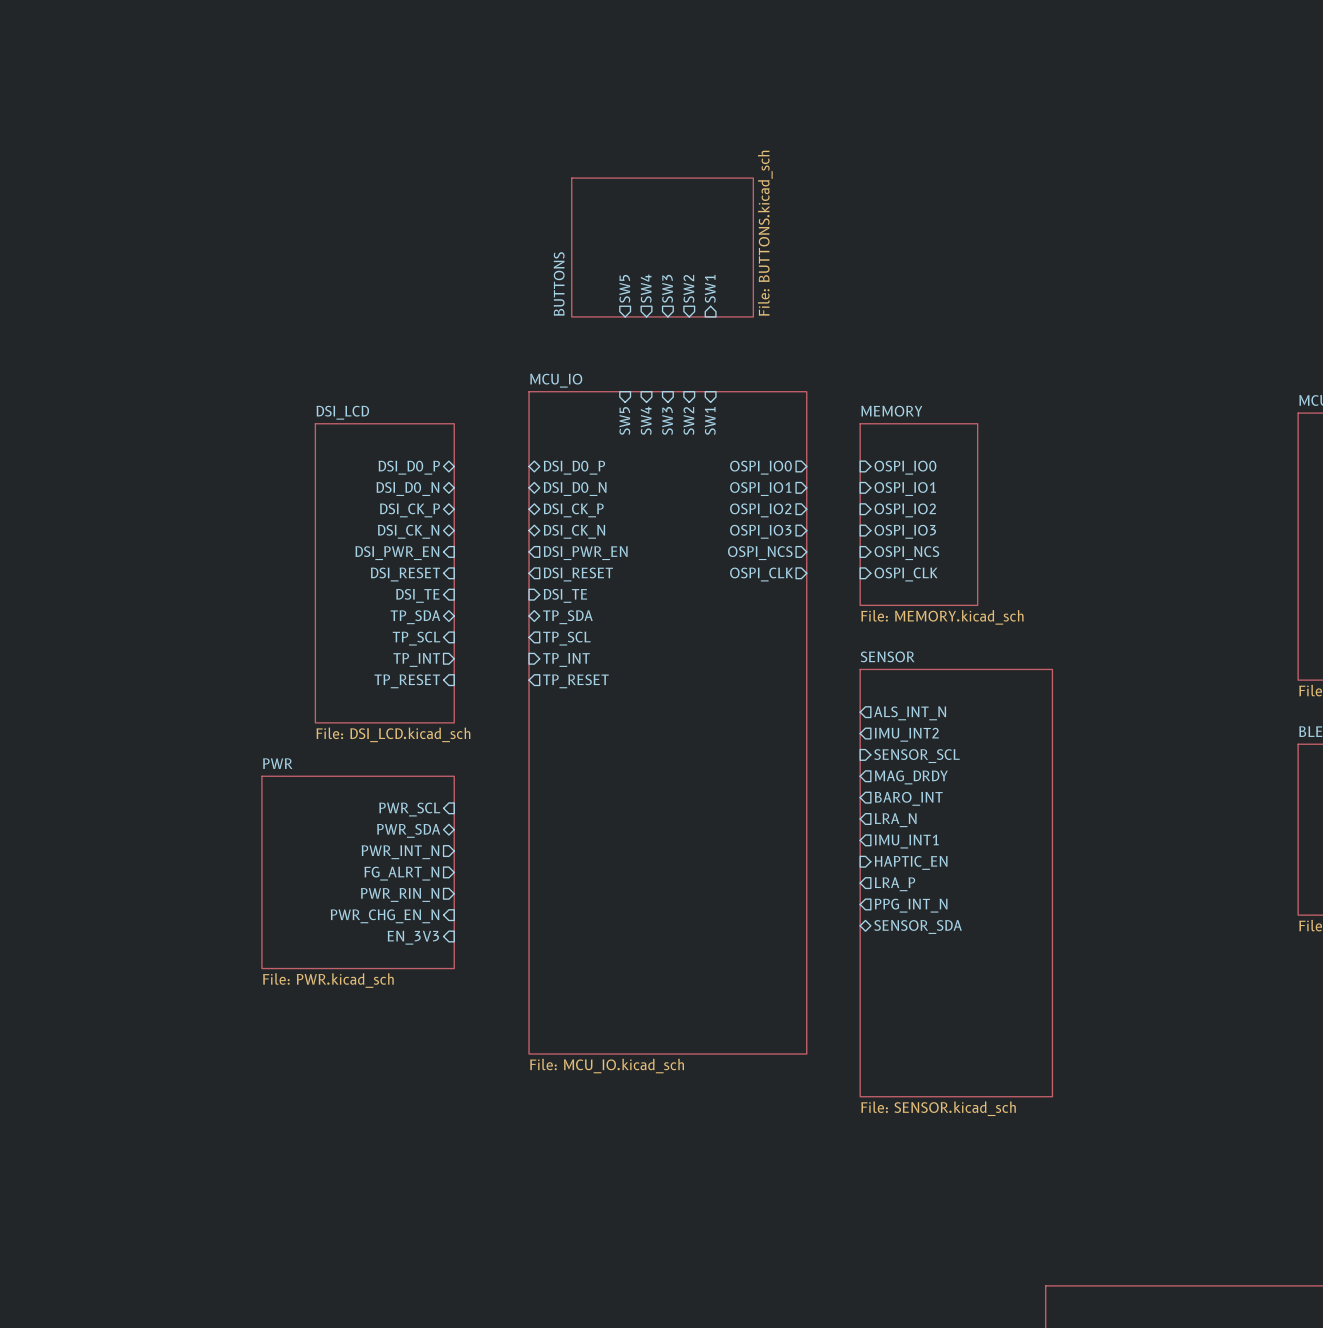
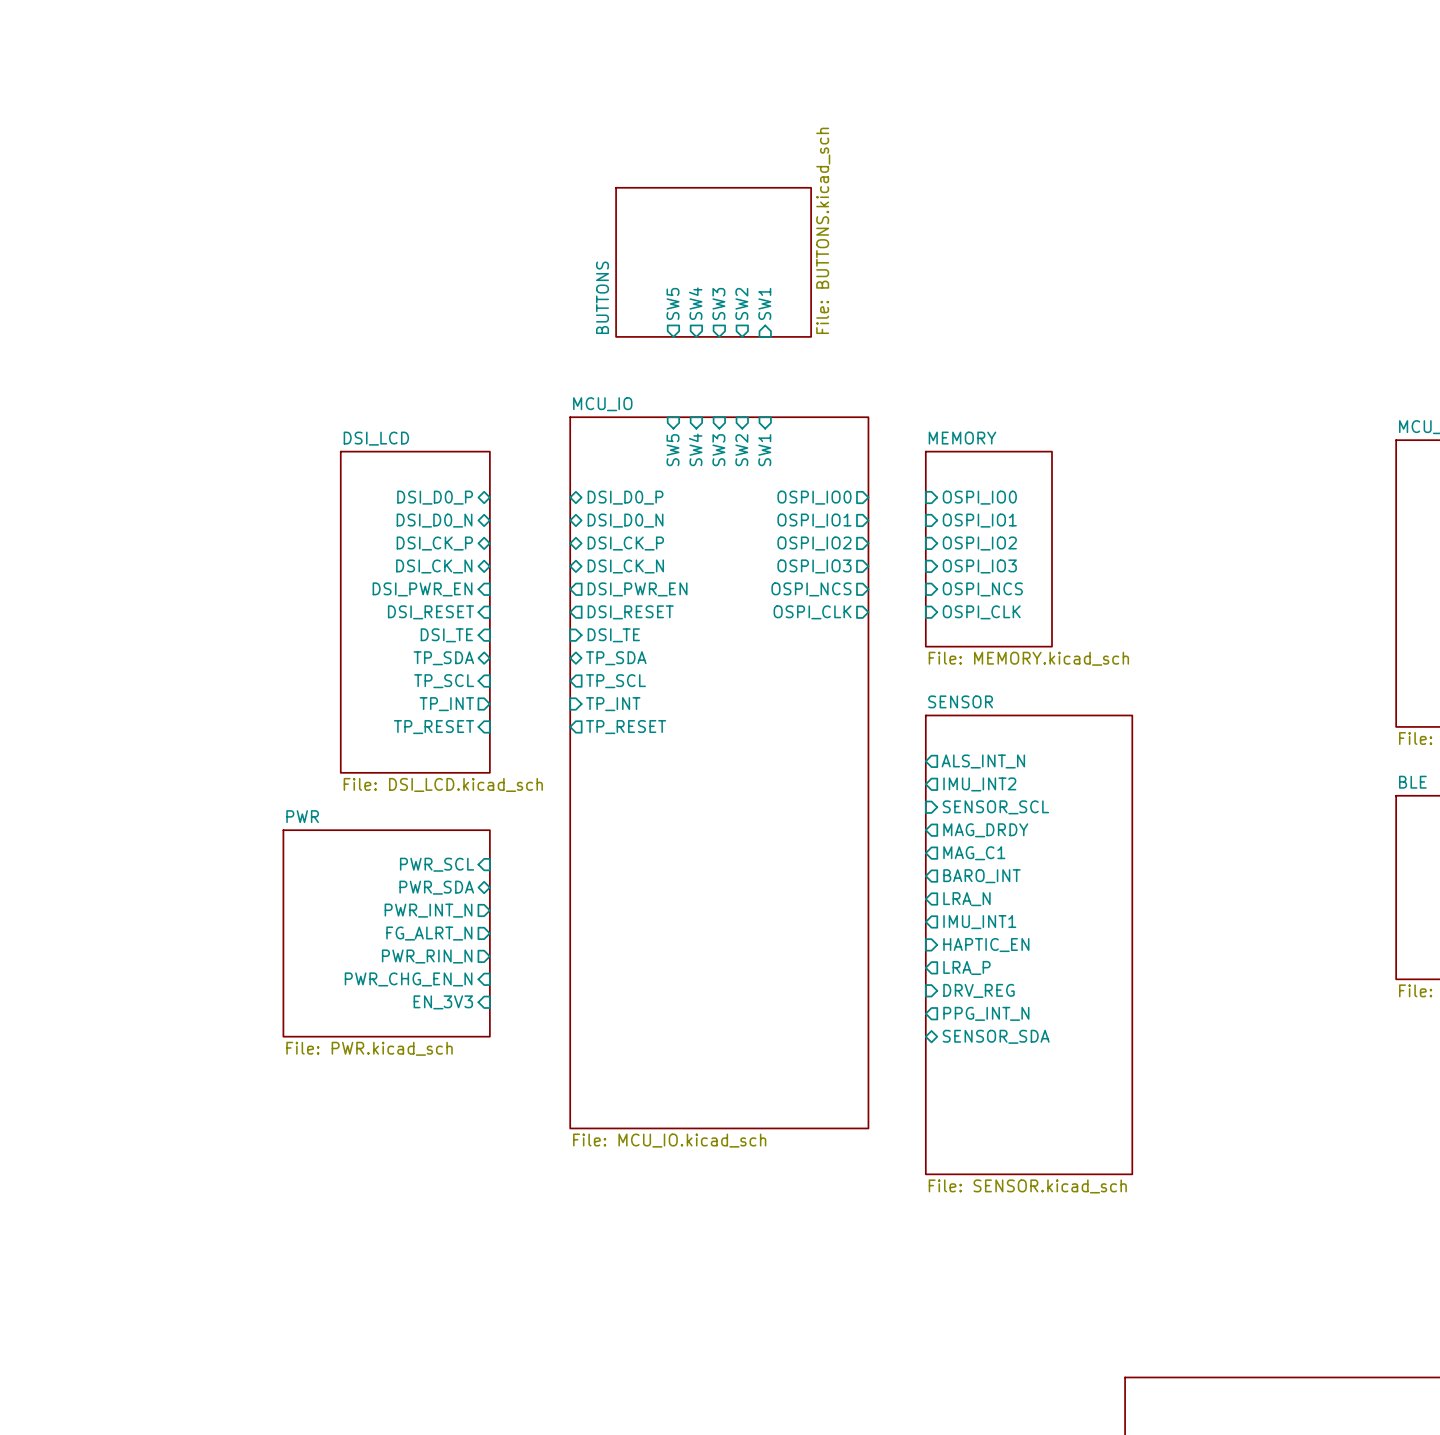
sheet pin: BARO_INT (908, 798) -> MAG_C1 (974, 853)
sheet pin: LRA_N (895, 820) -> BARO_INT (981, 876)
sheet pin: IMU_INT1 (906, 841) -> LRA_N (966, 899)
sheet pin shape: input (911, 862) -> output (979, 922)
sheet pin: HAPTIC_EN (911, 862) -> IMU_INT1 (979, 922)
sheet pin shape: output (894, 884) -> input (986, 945)
sheet pin: LRA_P (894, 884) -> HAPTIC_EN (986, 945)
sheet pin: PPG_INT_N (911, 905) -> LRA_P (966, 967)
sheet pin shape: bidirectional (918, 927) -> input (978, 990)
sheet pin: SENSOR_SDA (918, 927) -> DRV_REG (978, 990)
sheet pin: none -> PPG_INT_N (986, 1013)
sheet pin: none -> SENSOR_SDA (996, 1036)

